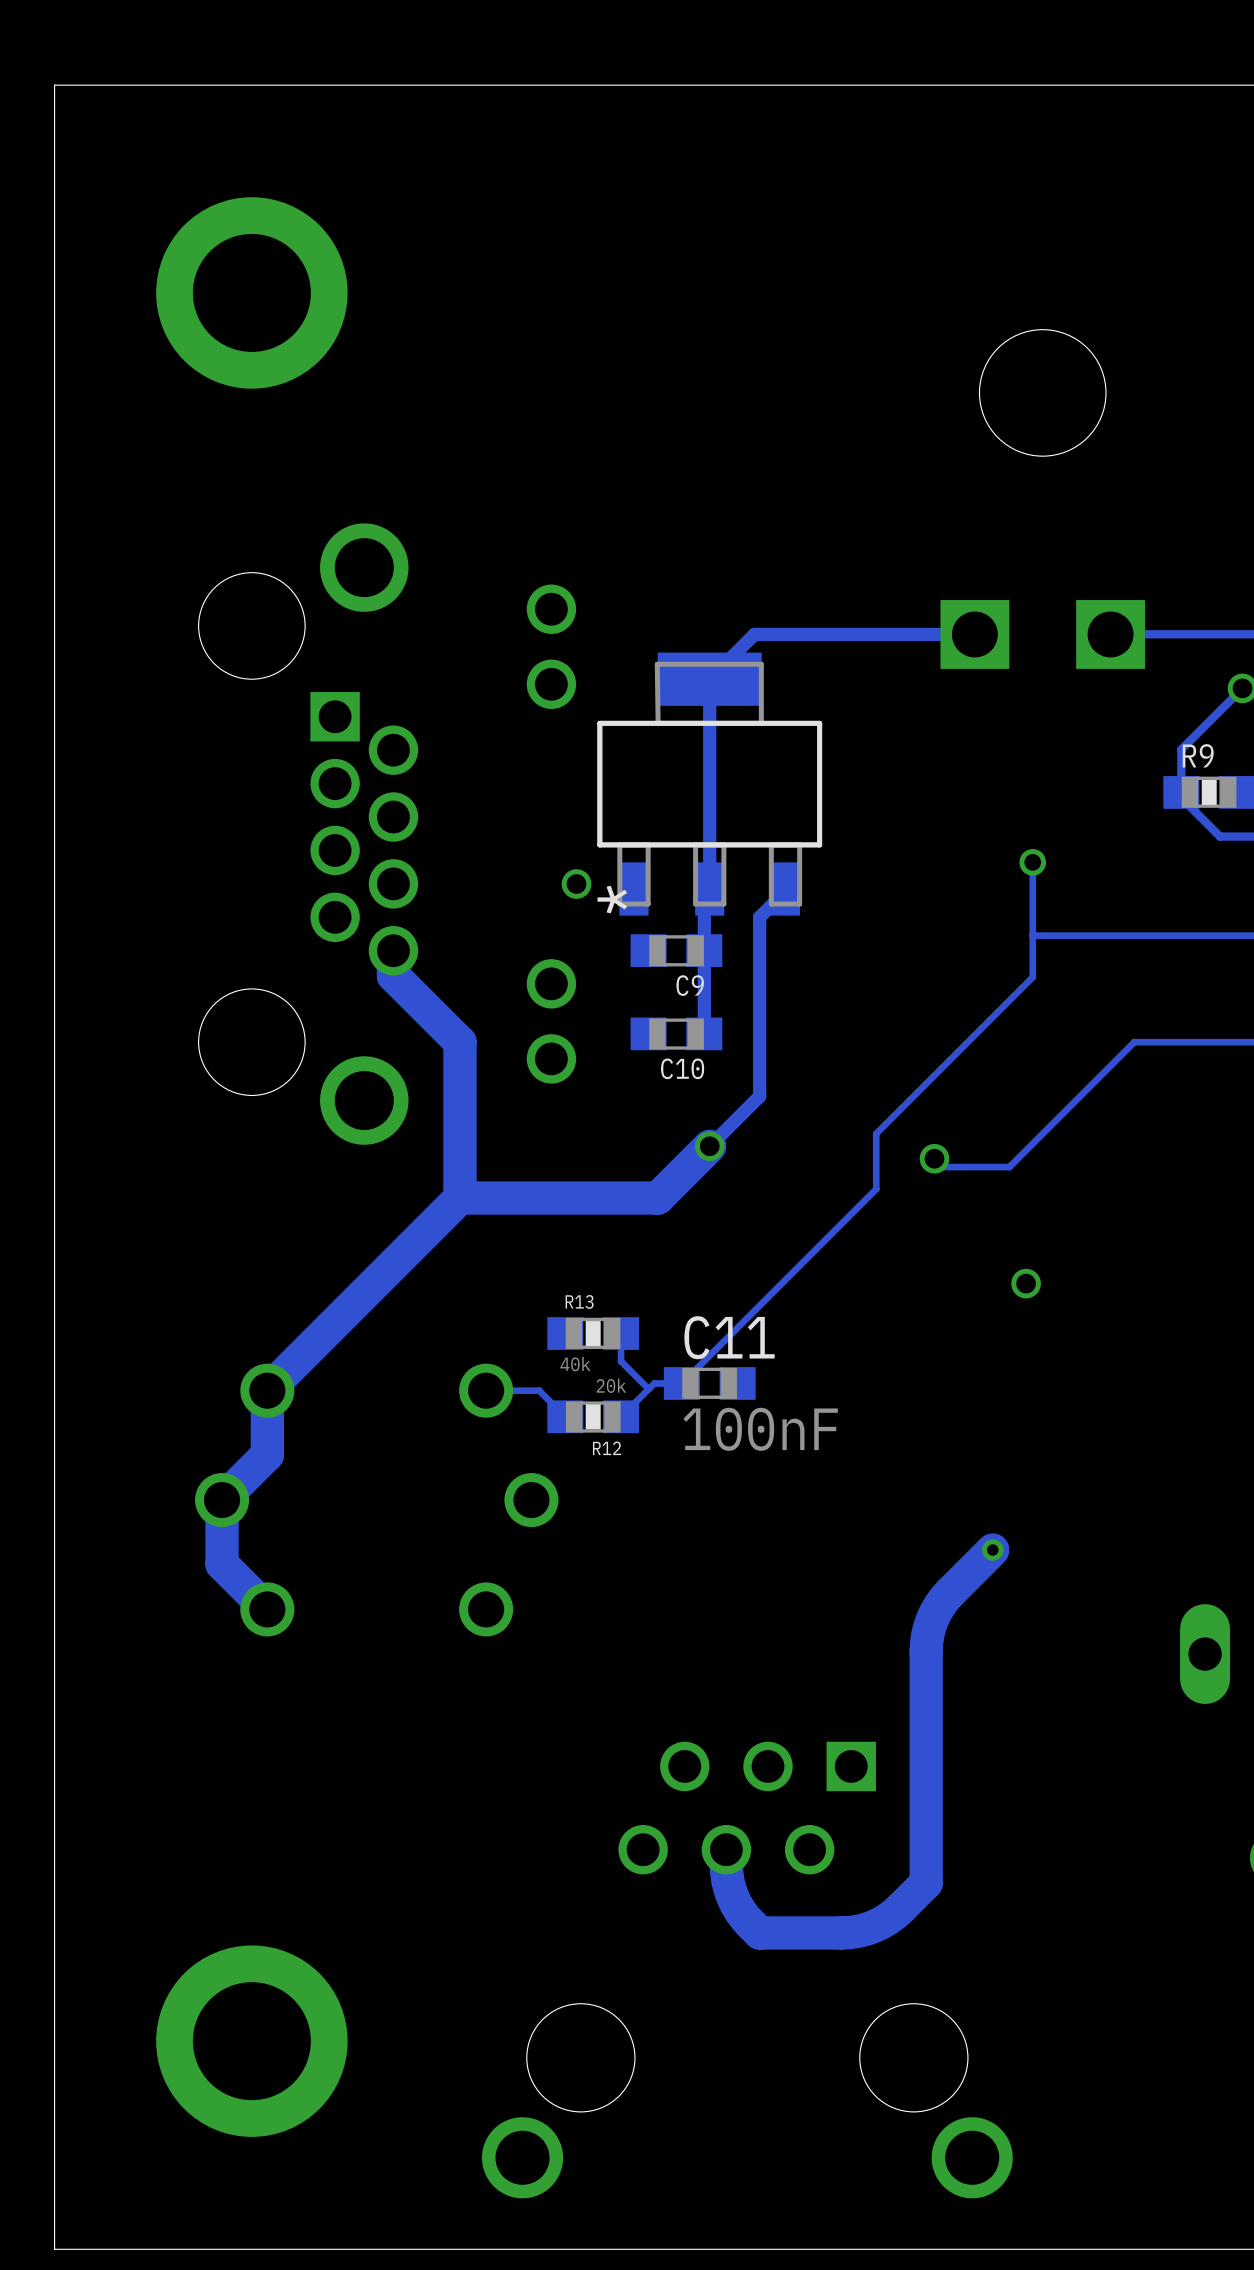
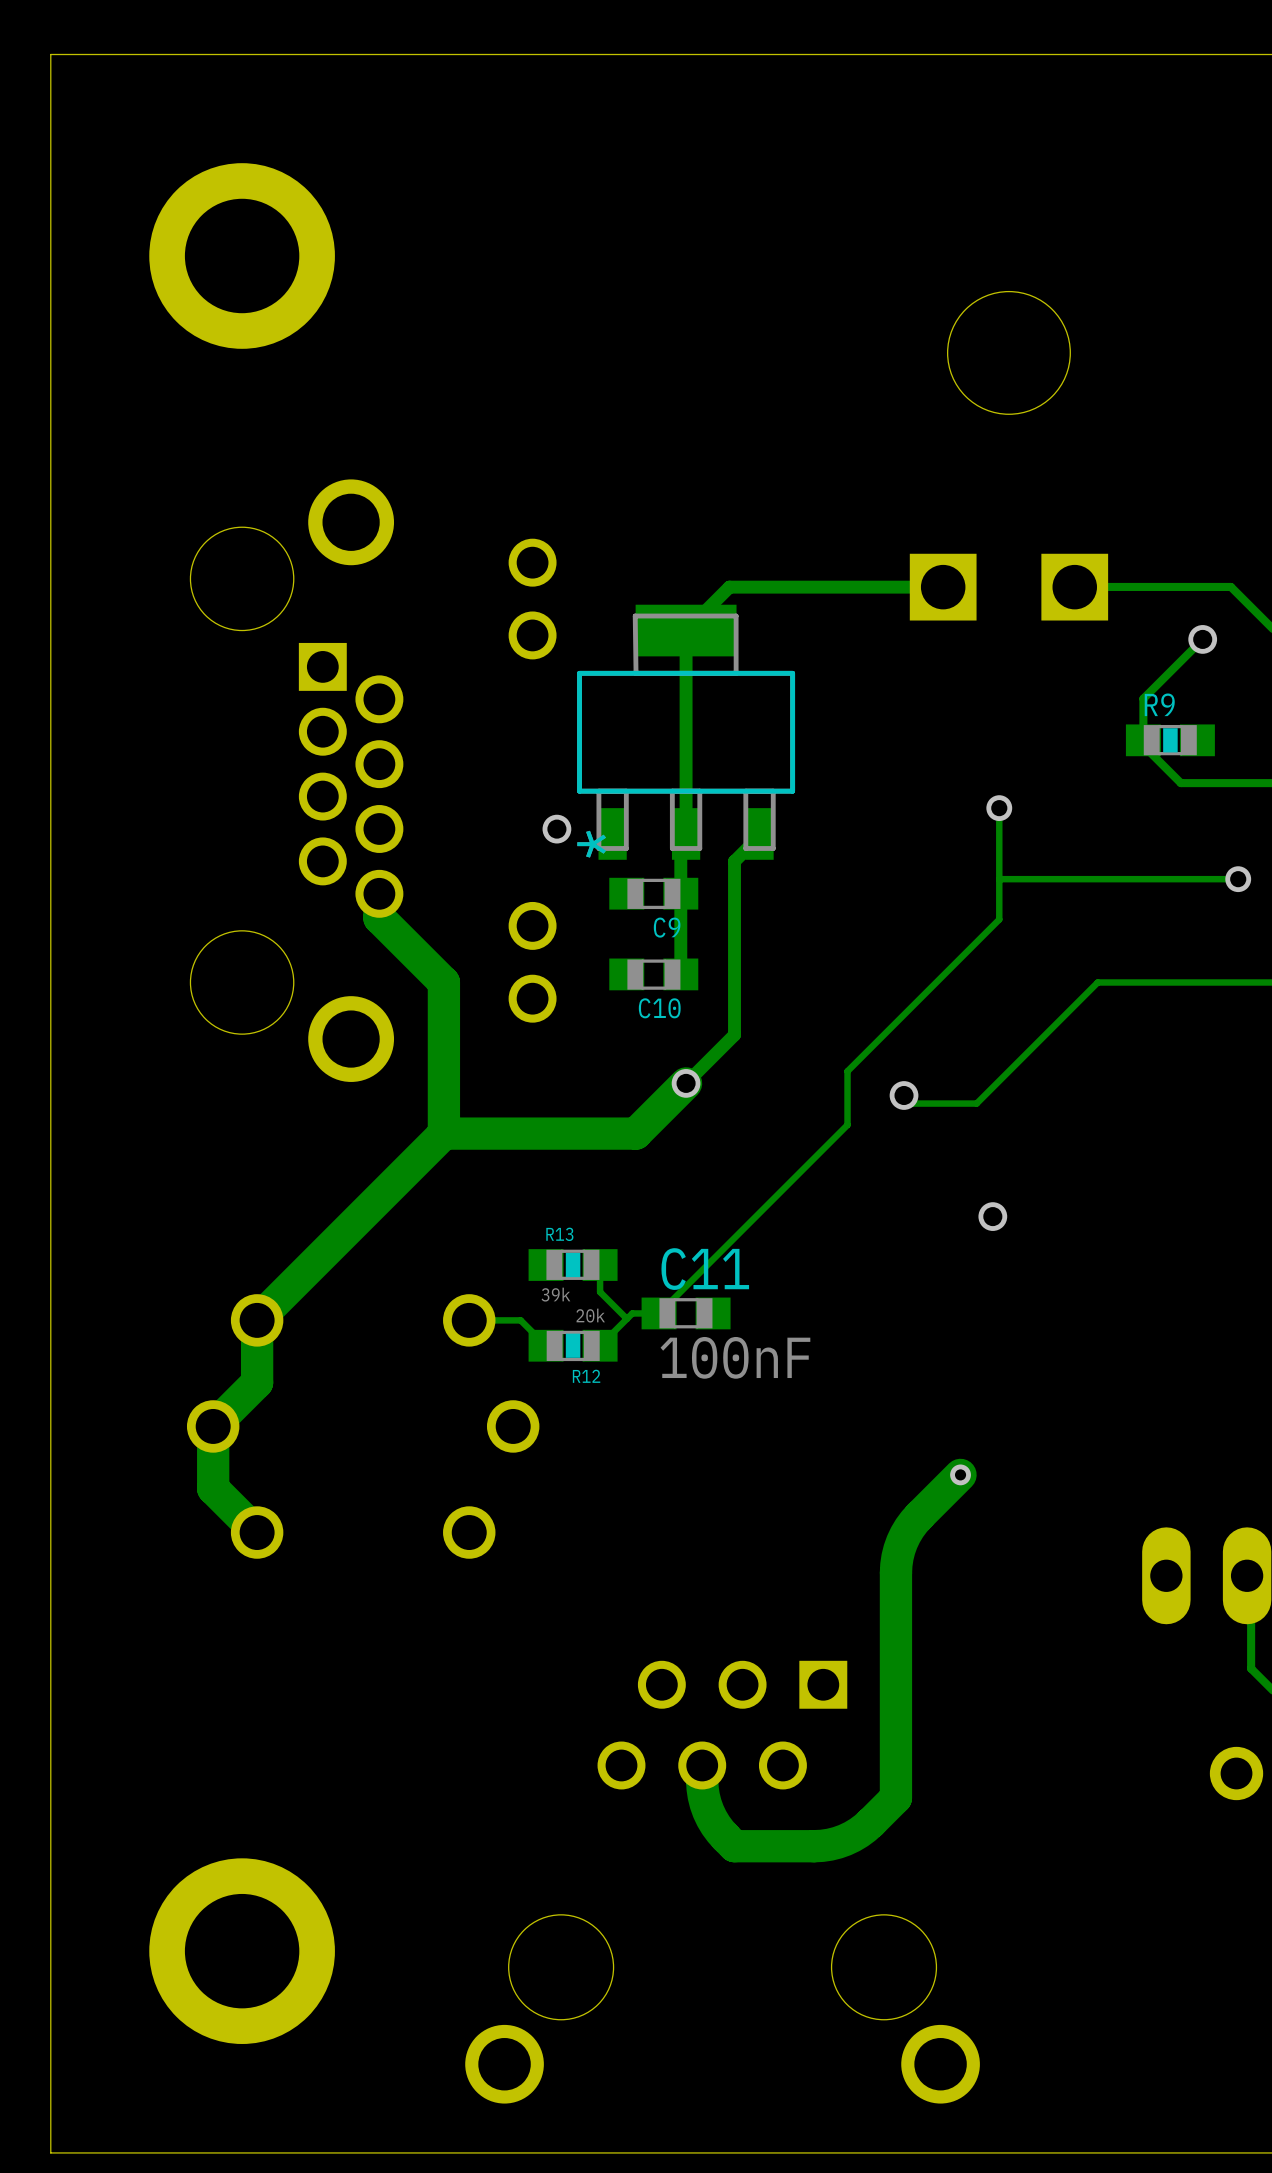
R13 value: 40k (575, 1364) -> 39k (555, 1294)

